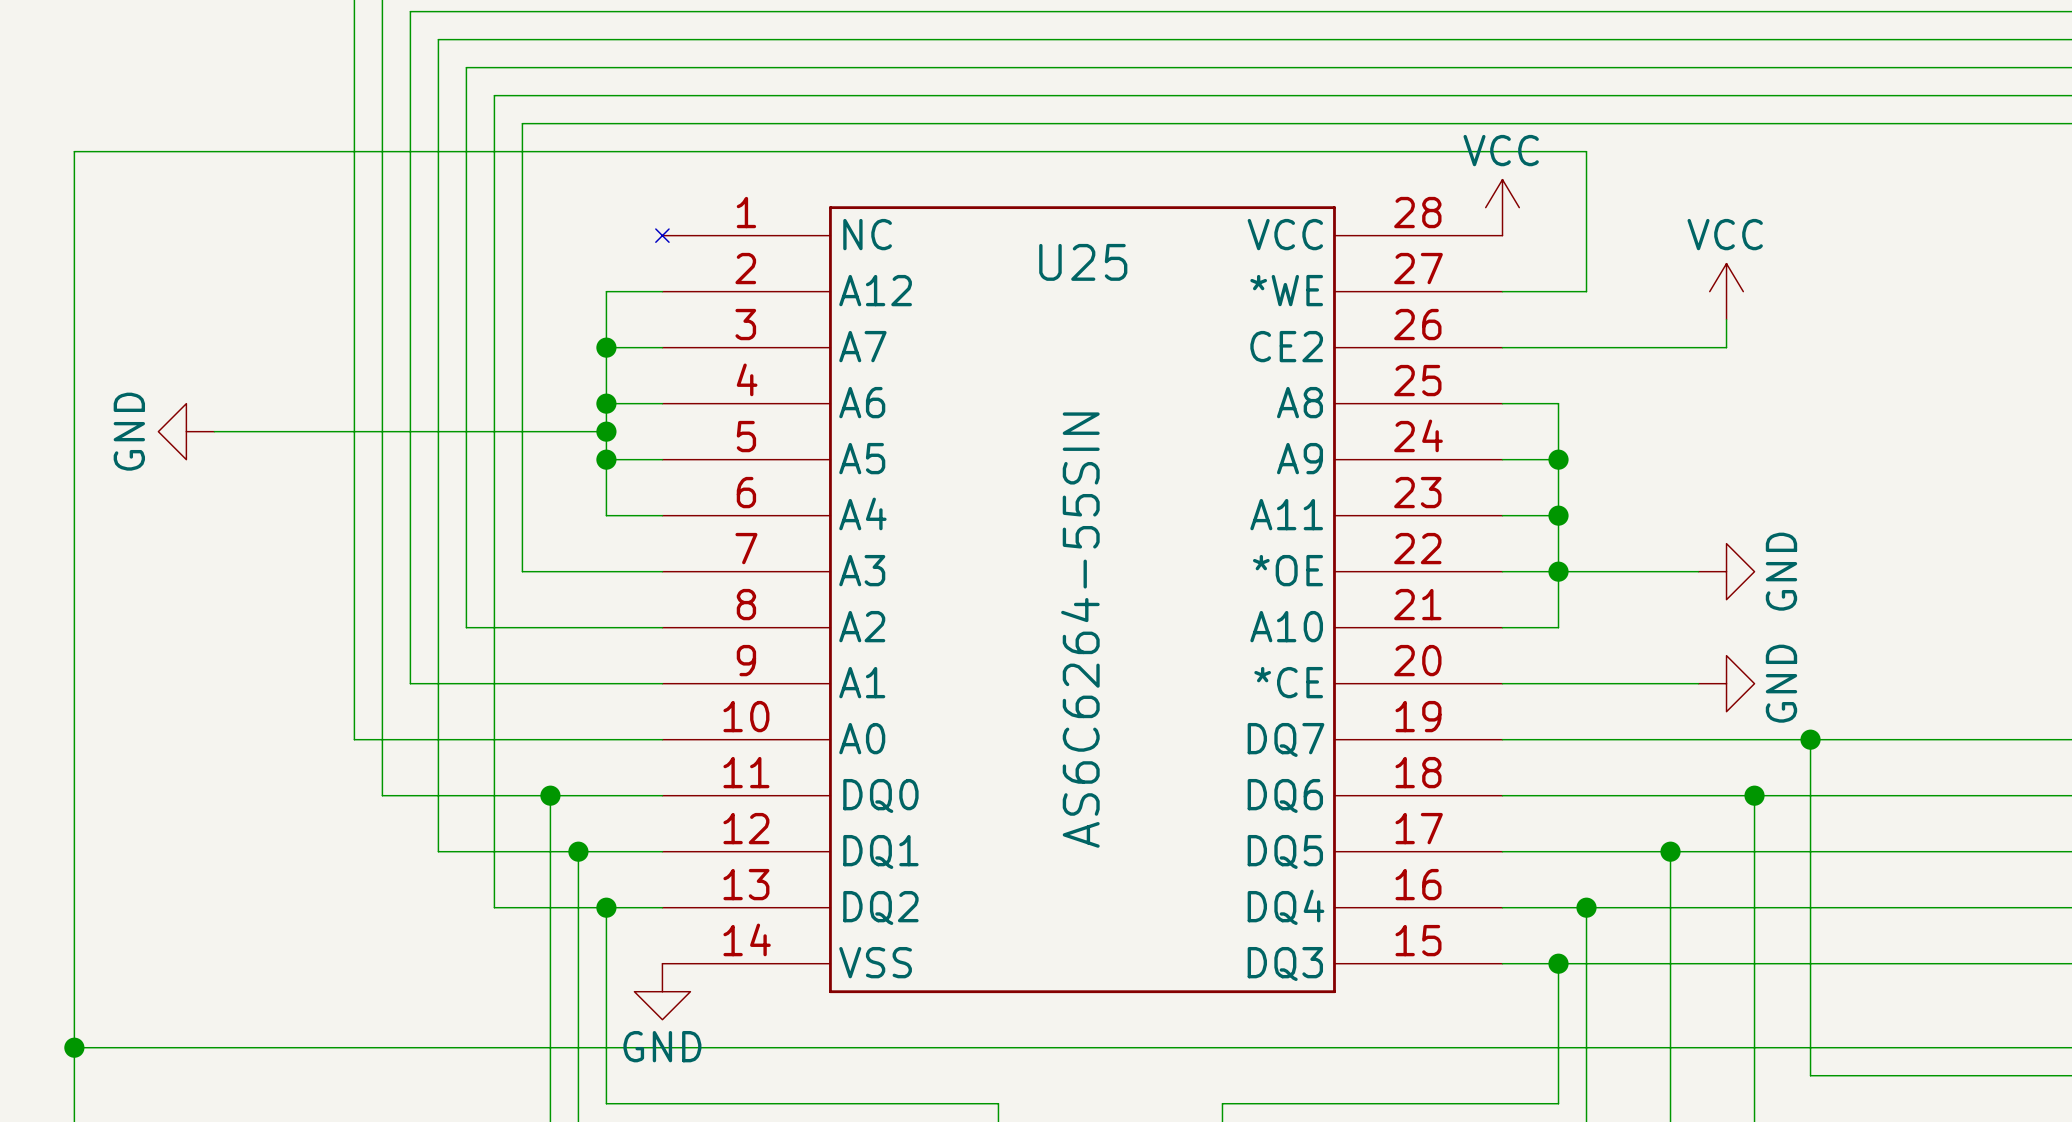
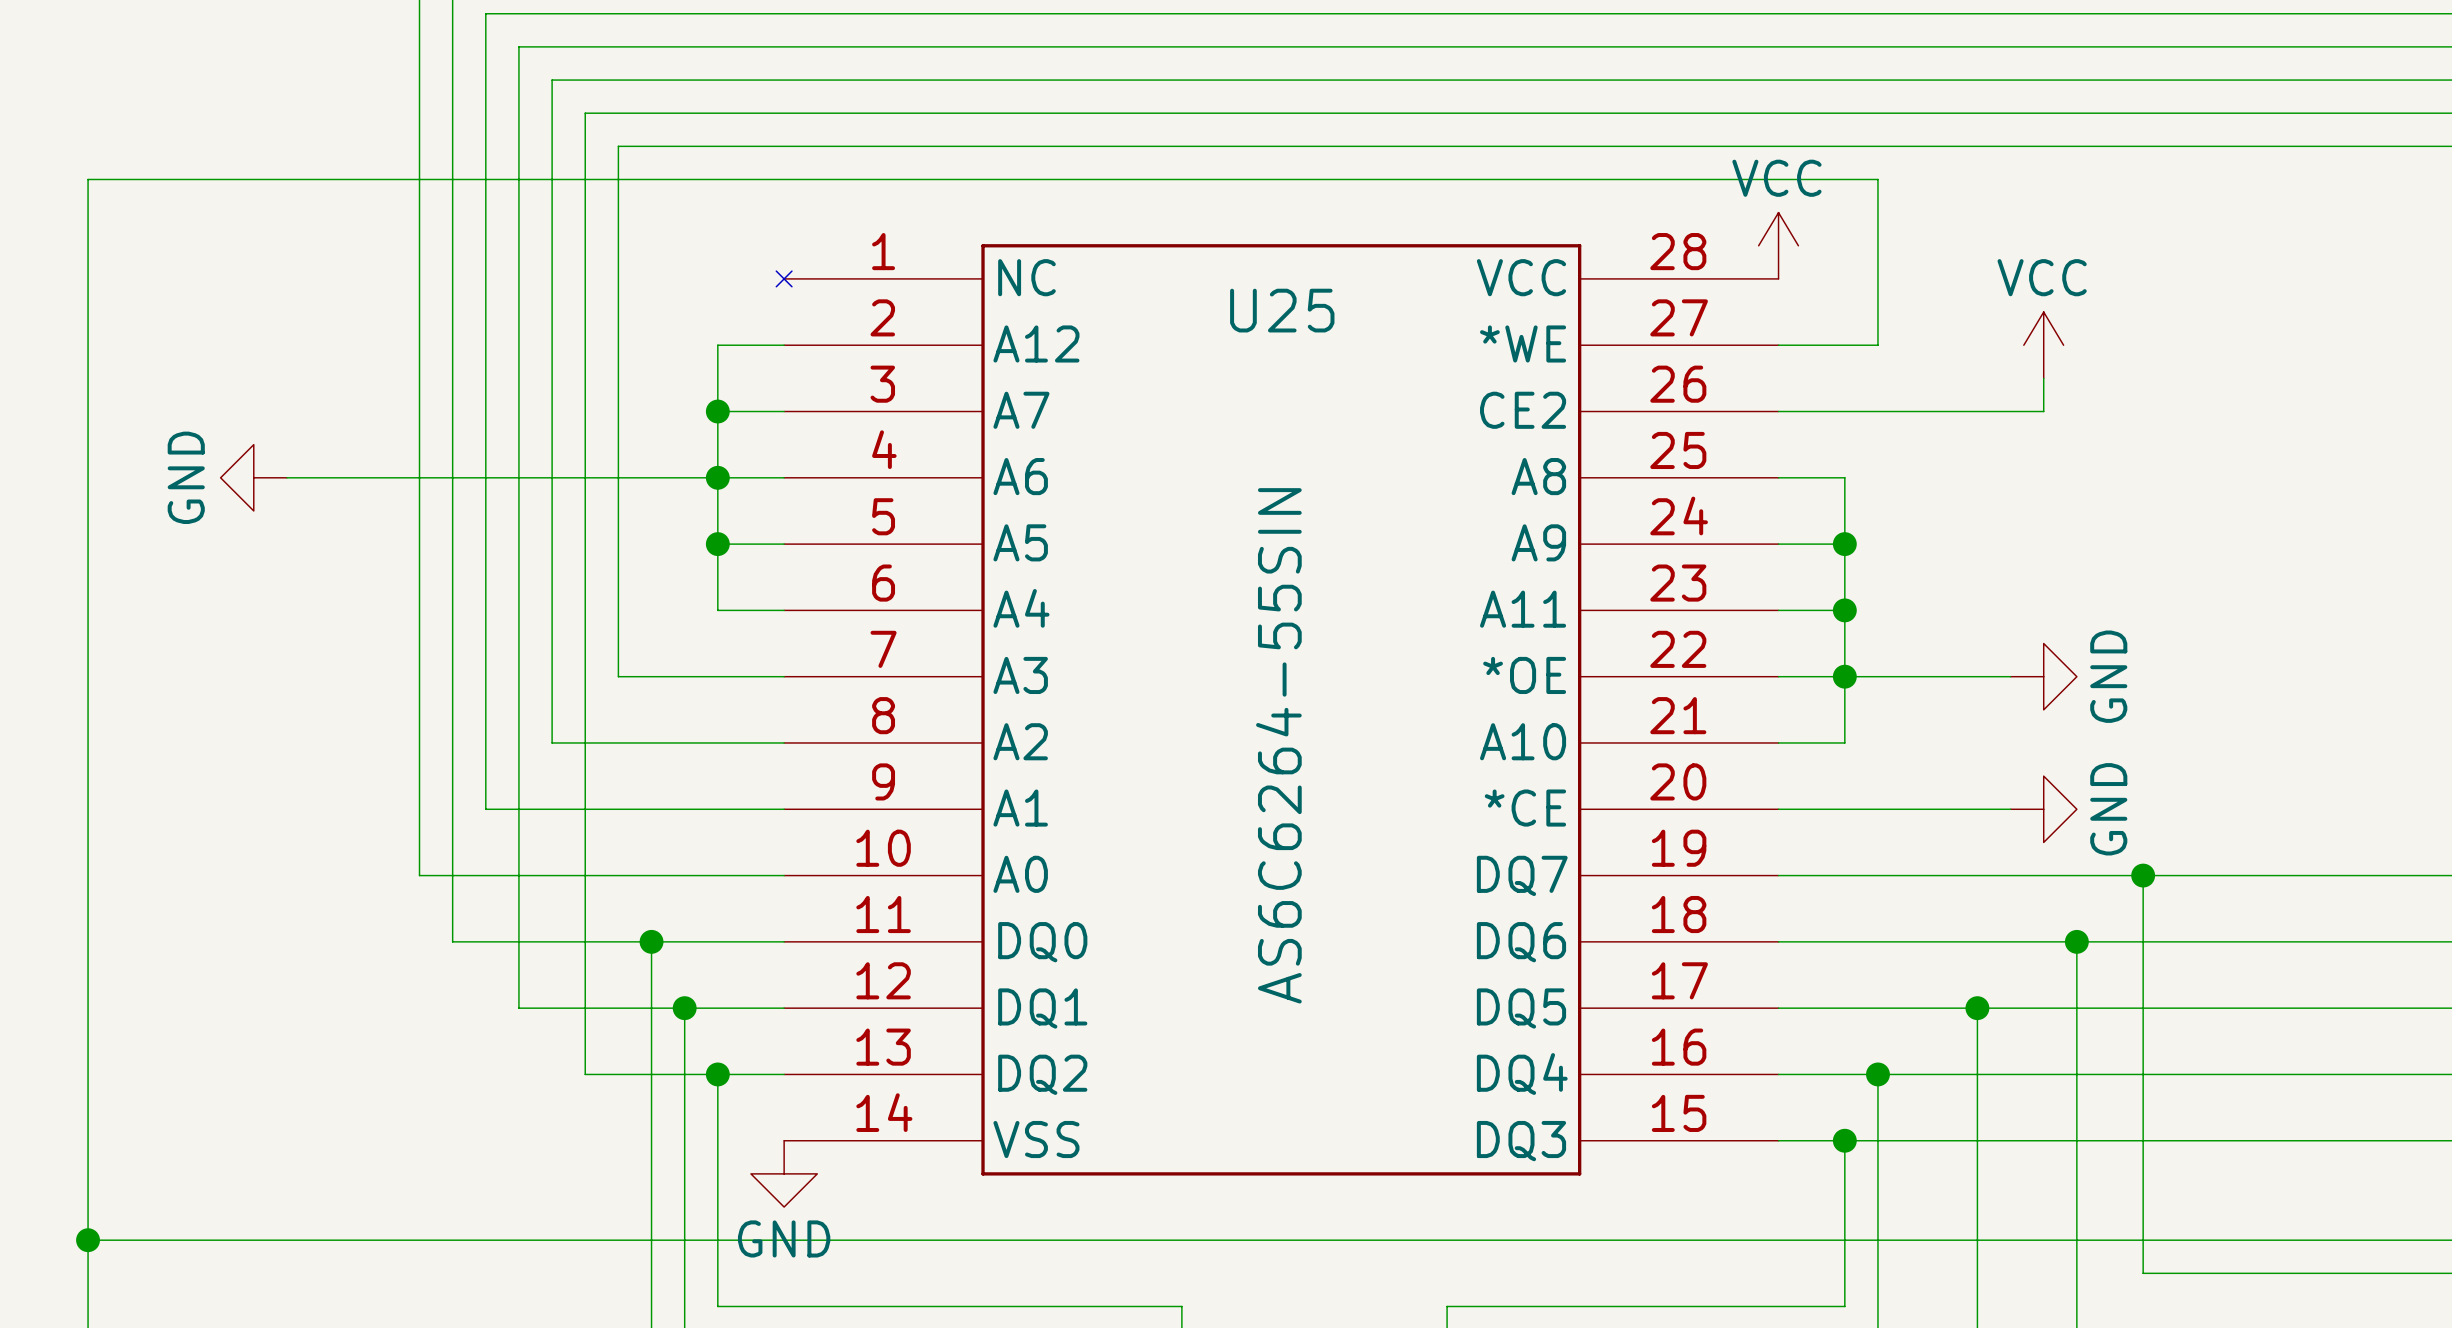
wire: none -> (286, 477) (717, 477)
power symbol position: GND (186, 431) -> GND (253, 477)
wire: (214, 431) (606, 431) -> none
junction: (606, 431) -> none

